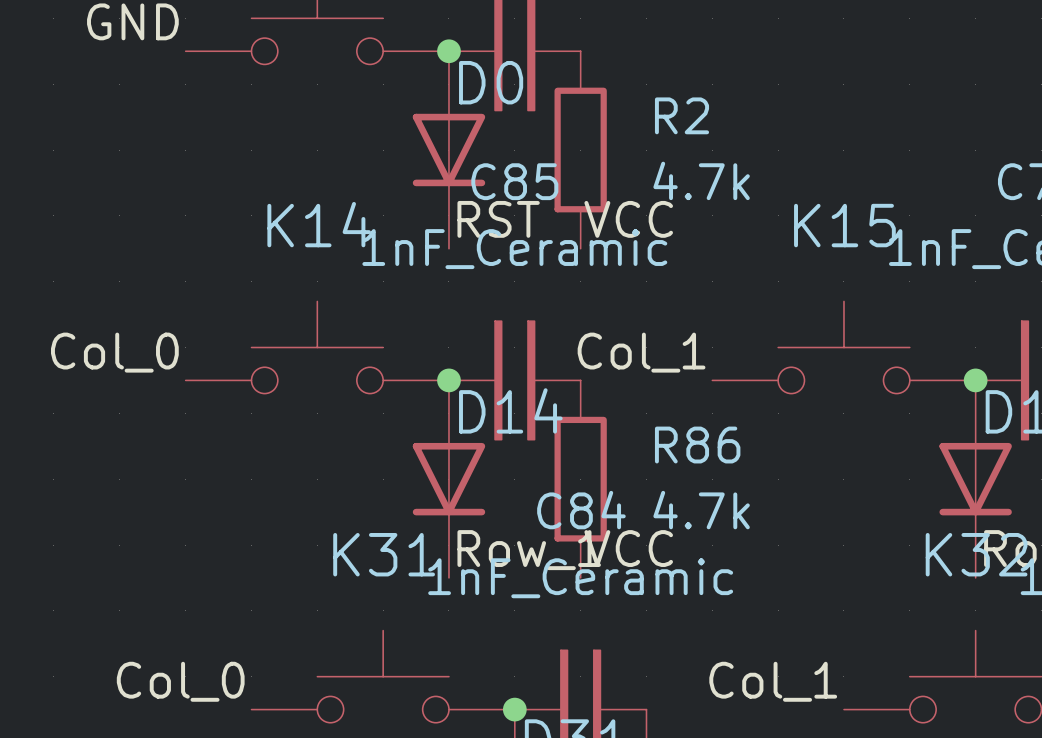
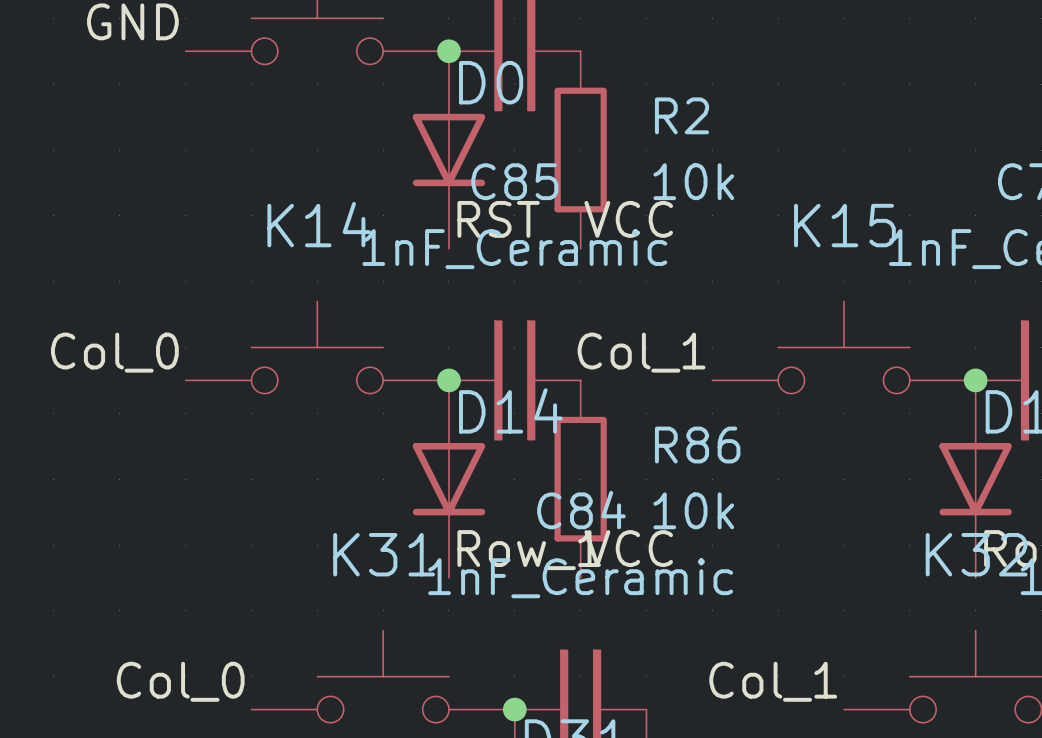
R2 value: 4.7k (701, 180) -> 10k (693, 181)
R86 value: 4.7k (701, 510) -> 10k (693, 510)

